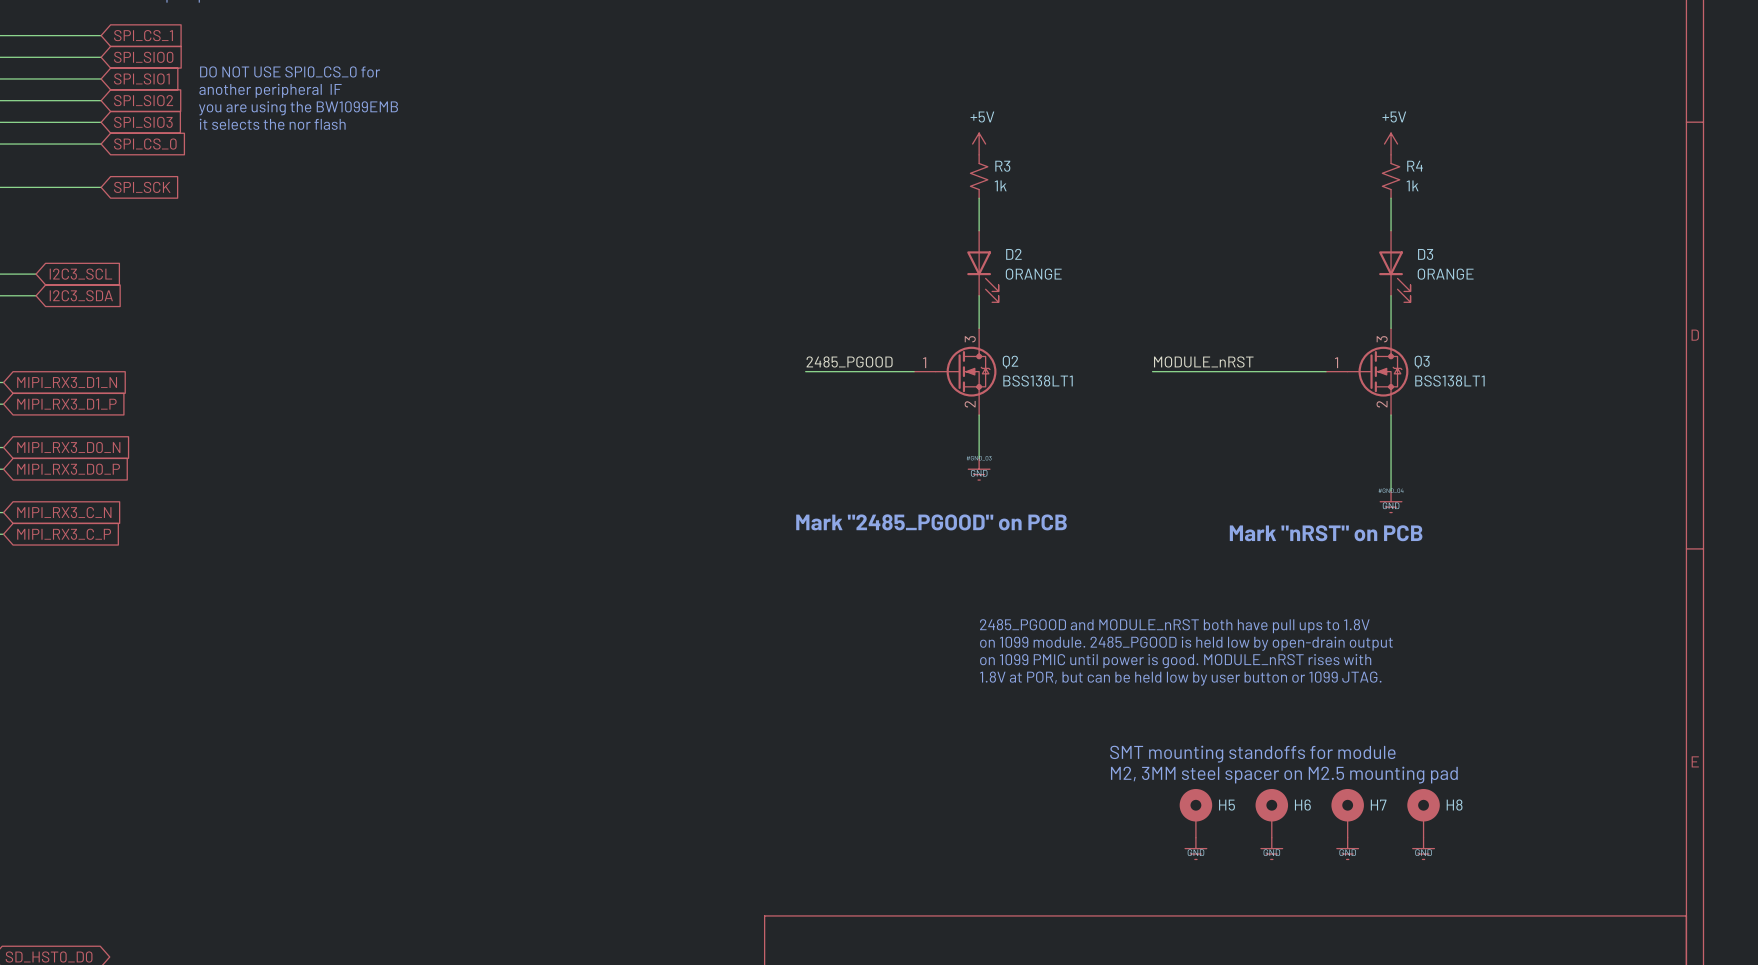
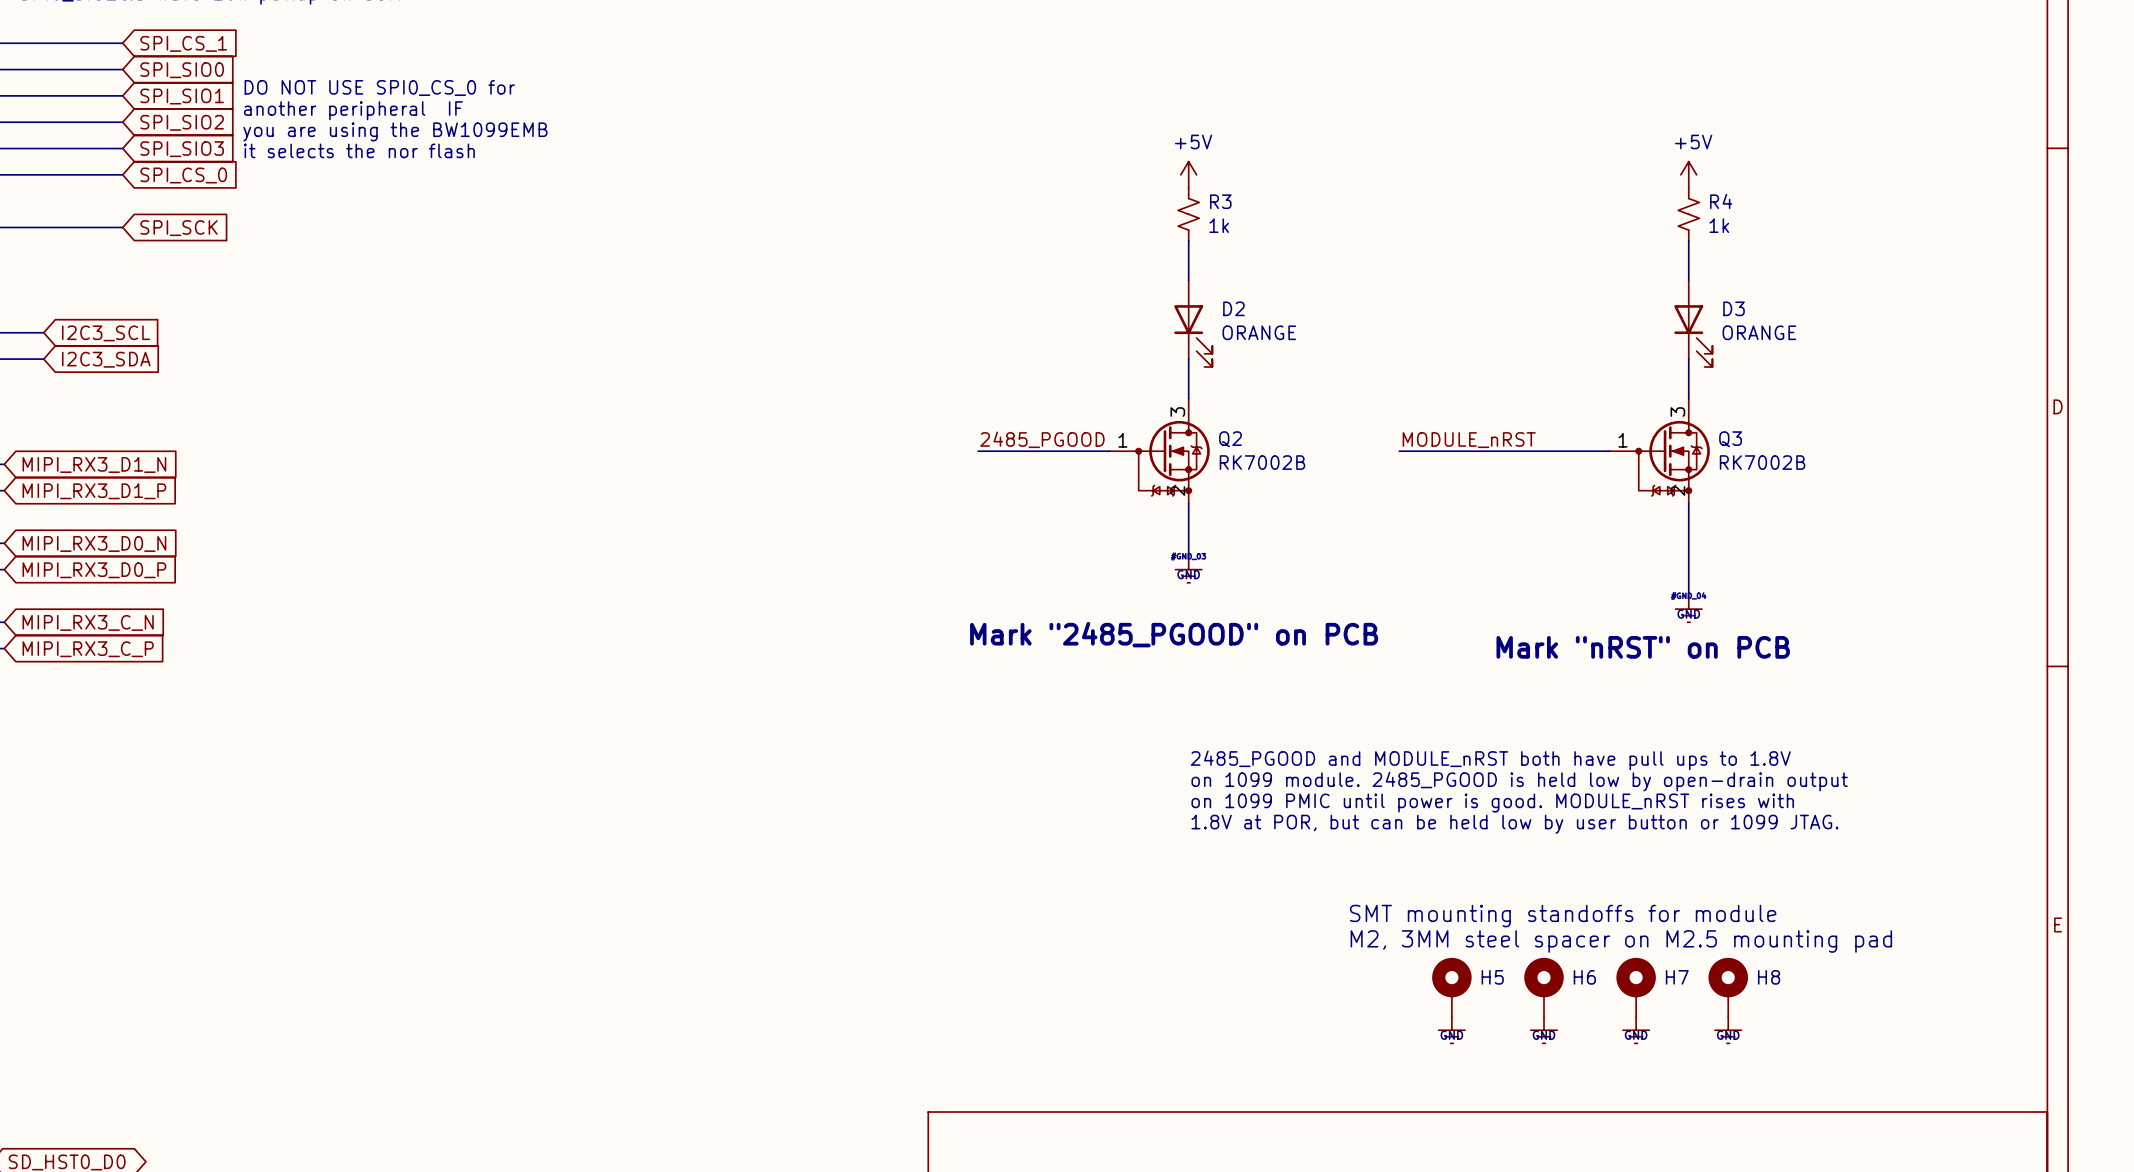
Q2 symbol: [914, 328, 997, 416] -> [1109, 398, 1210, 504]
Q3 symbol: [1325, 328, 1409, 416] -> [1609, 398, 1710, 504]
Q2 value: BSS138LT1 (1038, 380) -> RK7002B (1262, 462)
Q3 value: BSS138LT1 (1449, 380) -> RK7002B (1762, 462)

